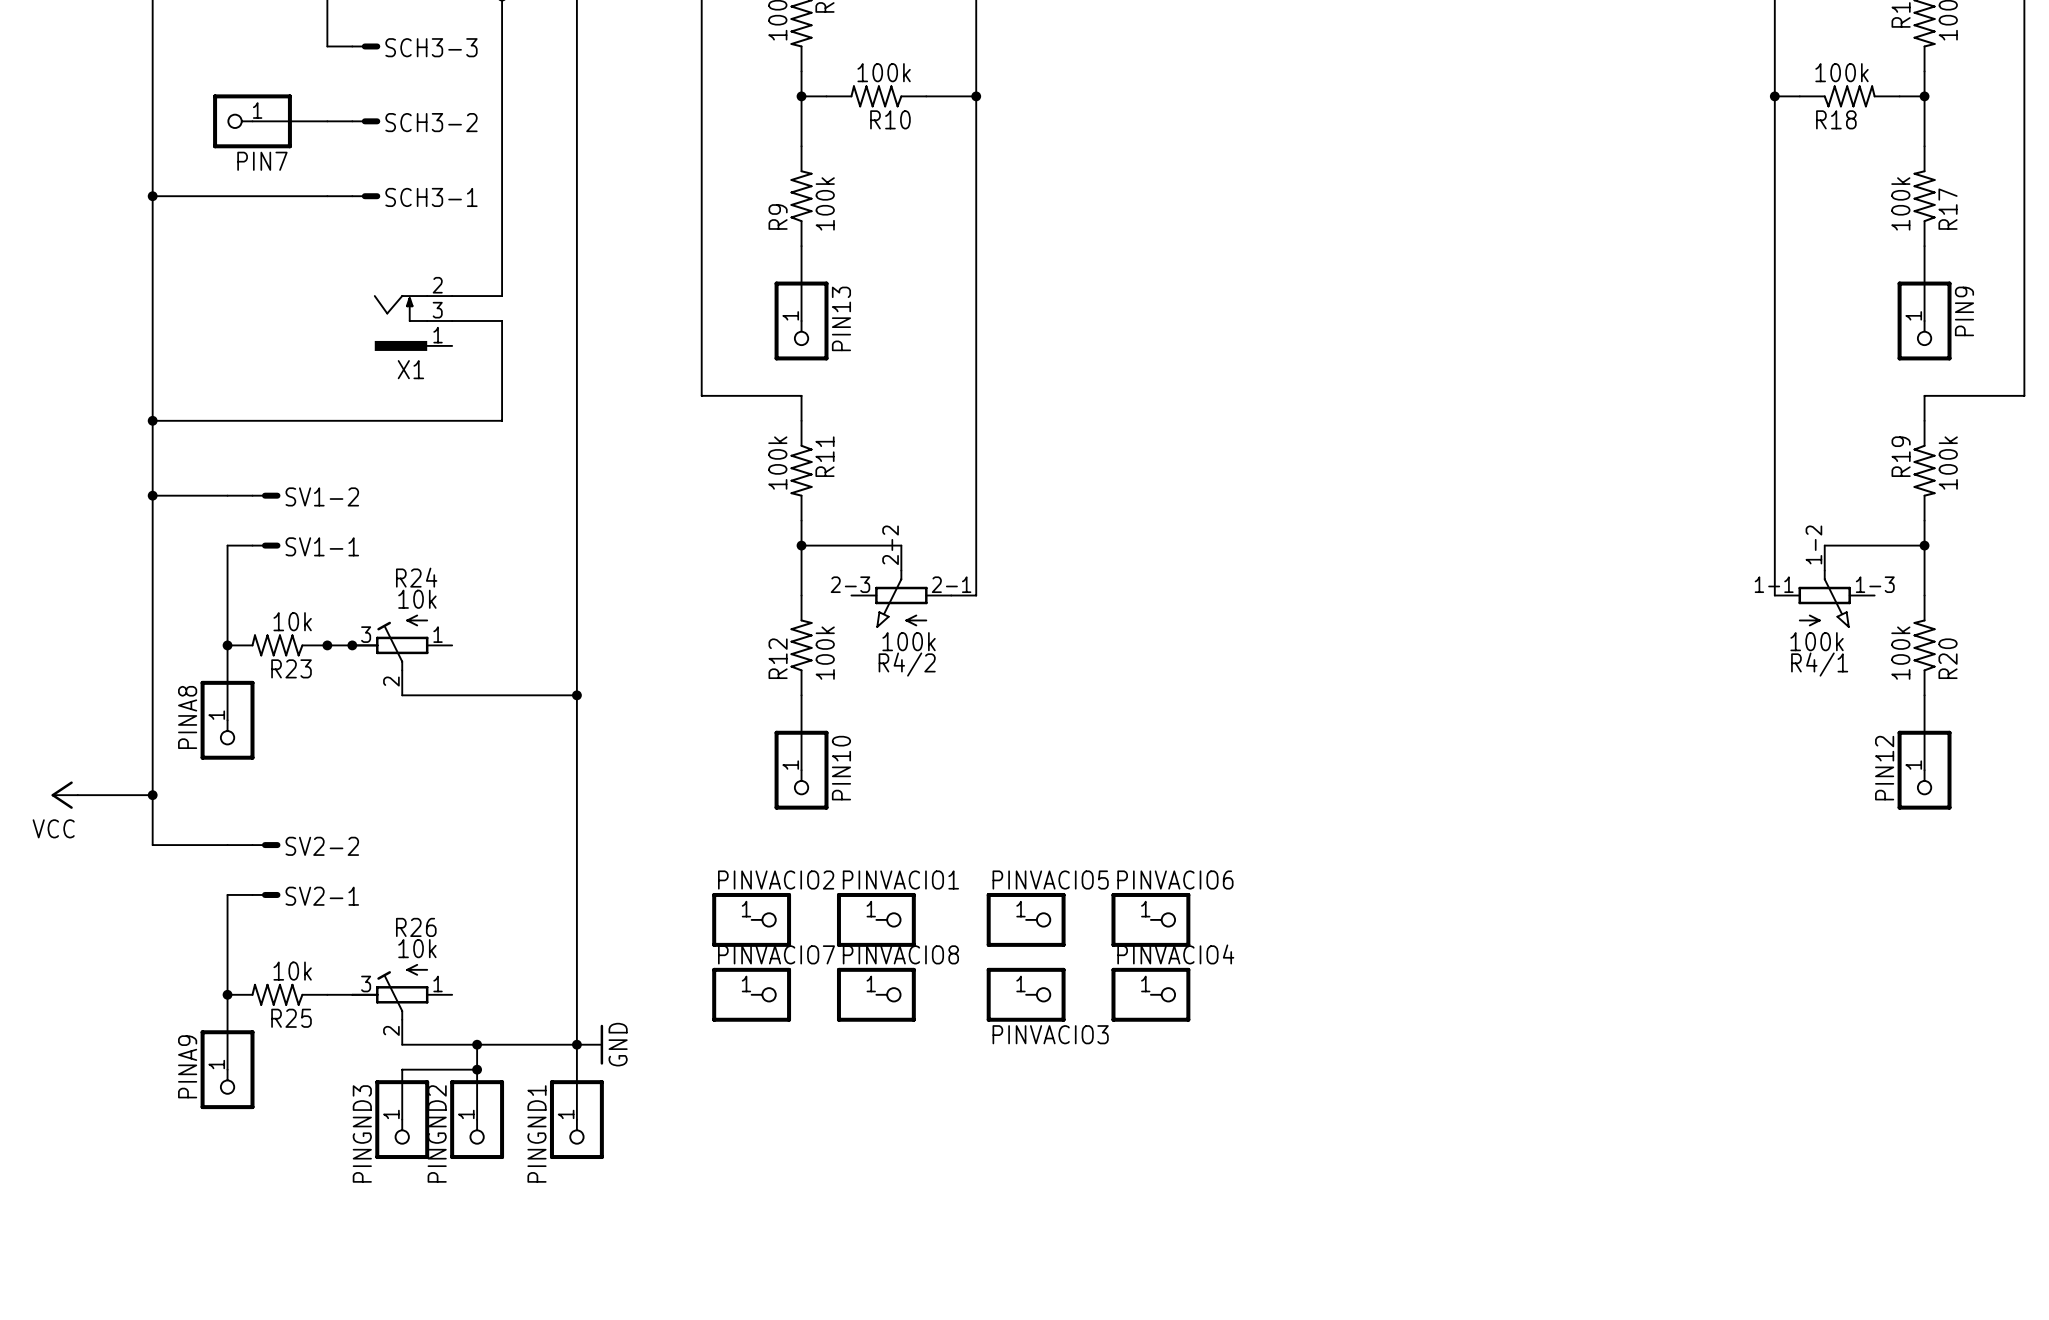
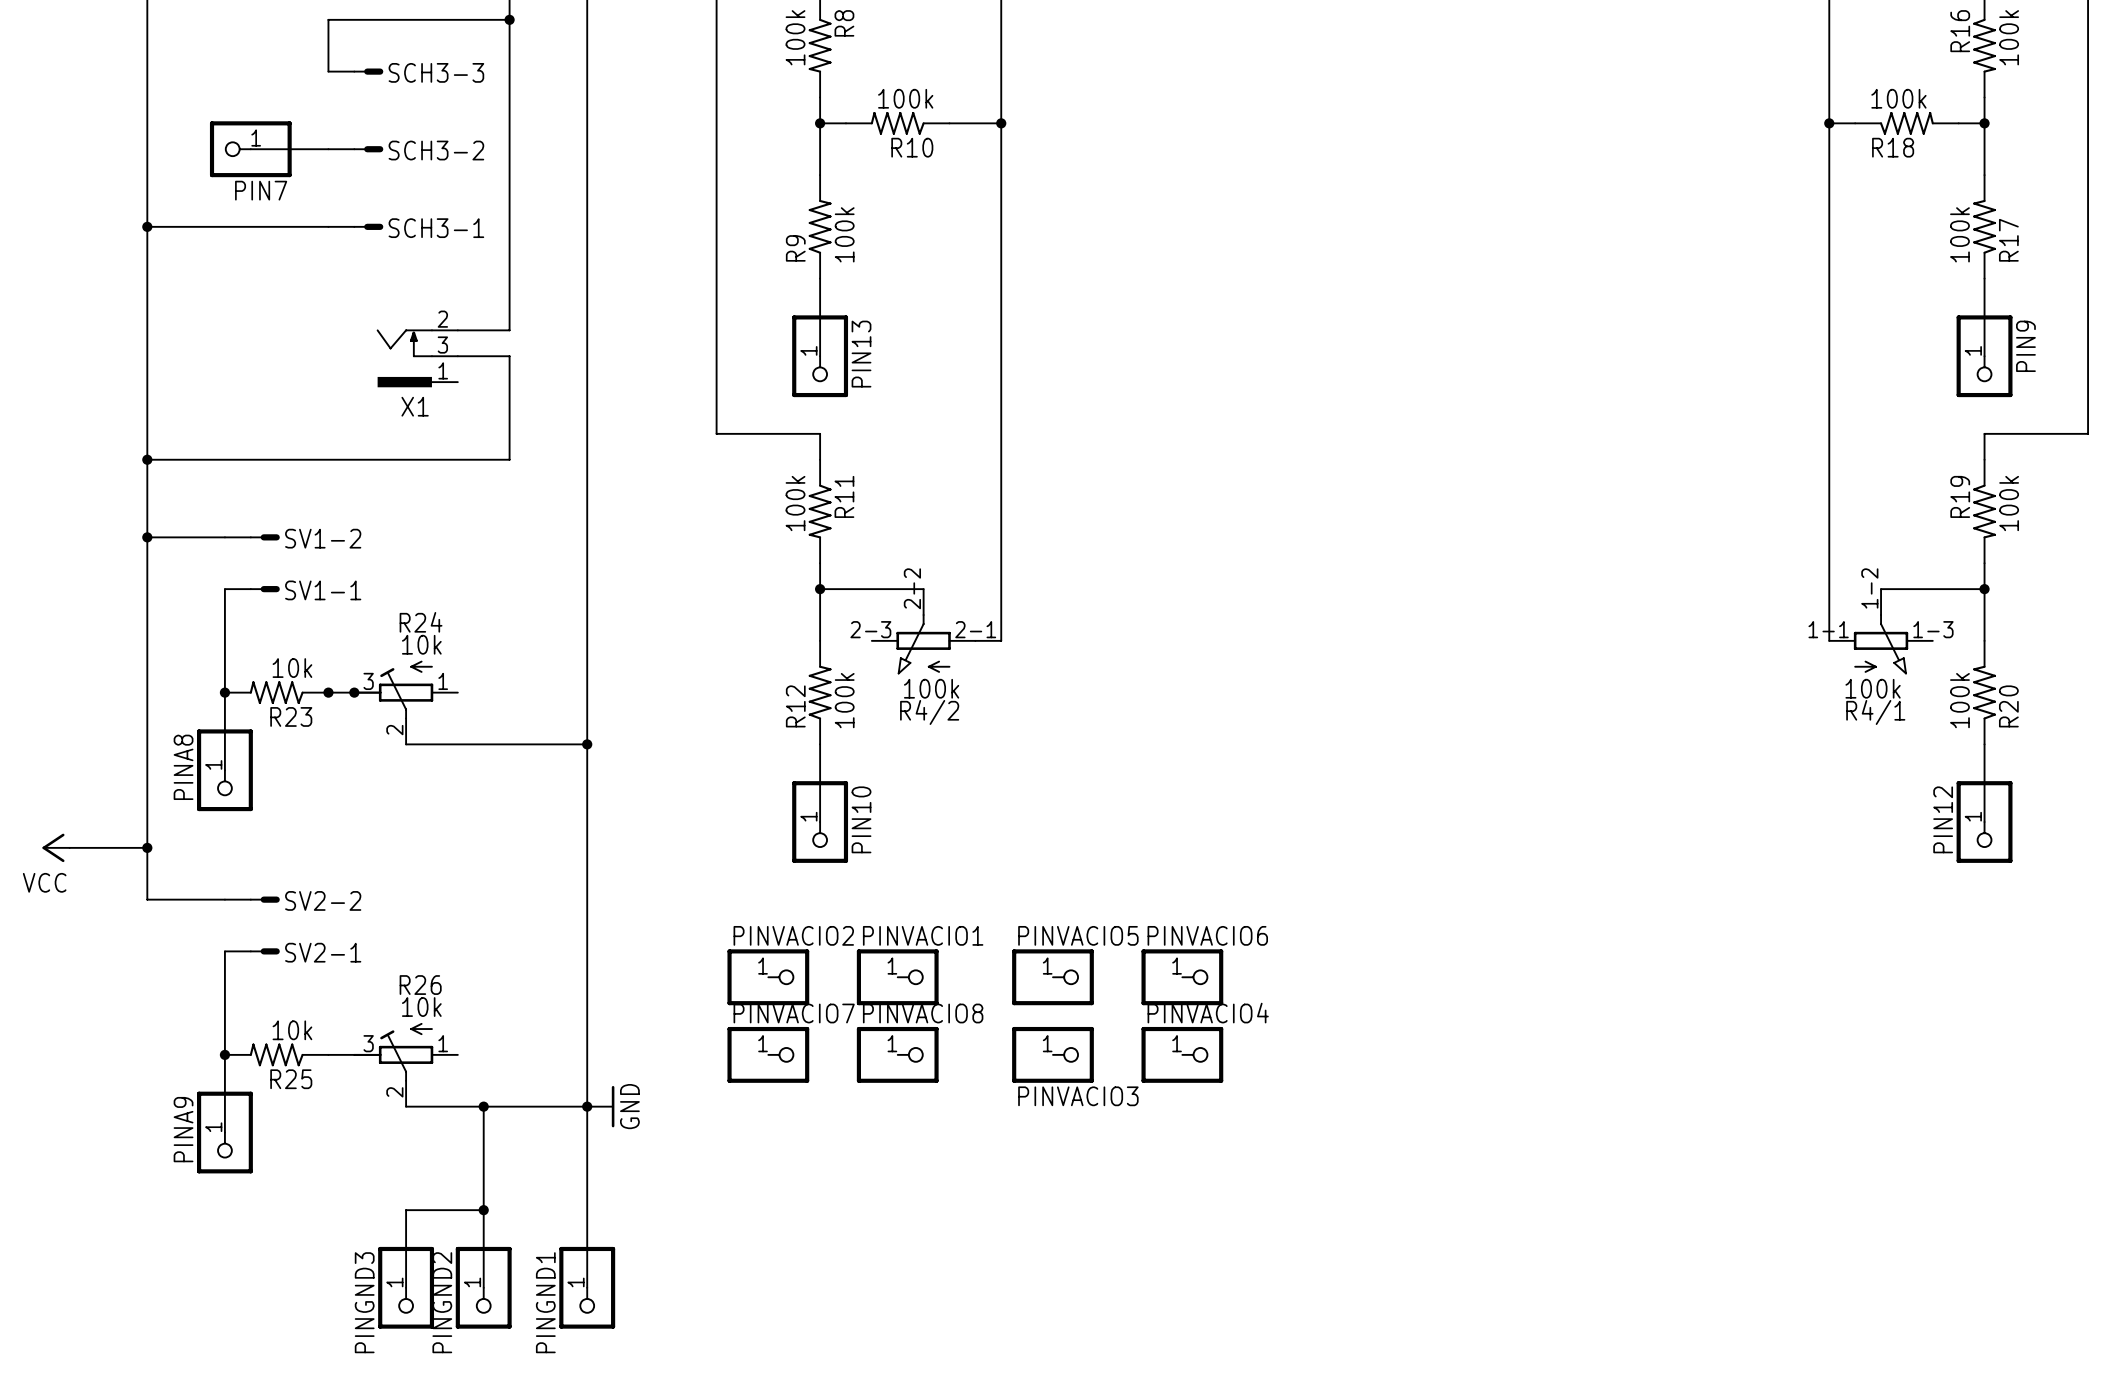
wire: (477, 1069) (402, 1069) (402, 1119) -> none
junction: (477, 1069) -> none
PINGND3 position: (402, 1119) -> (406, 1287)
wire: none -> (483, 1184) (483, 1287)
PINGND2 position: (477, 1119) -> (483, 1287)
wire: none -> (587, 1184) (587, 1287)
PINGND1 position: (576, 1119) -> (587, 1287)
wire: none -> (483, 1210) (406, 1210) (406, 1287)
junction: none -> (483, 1210)

